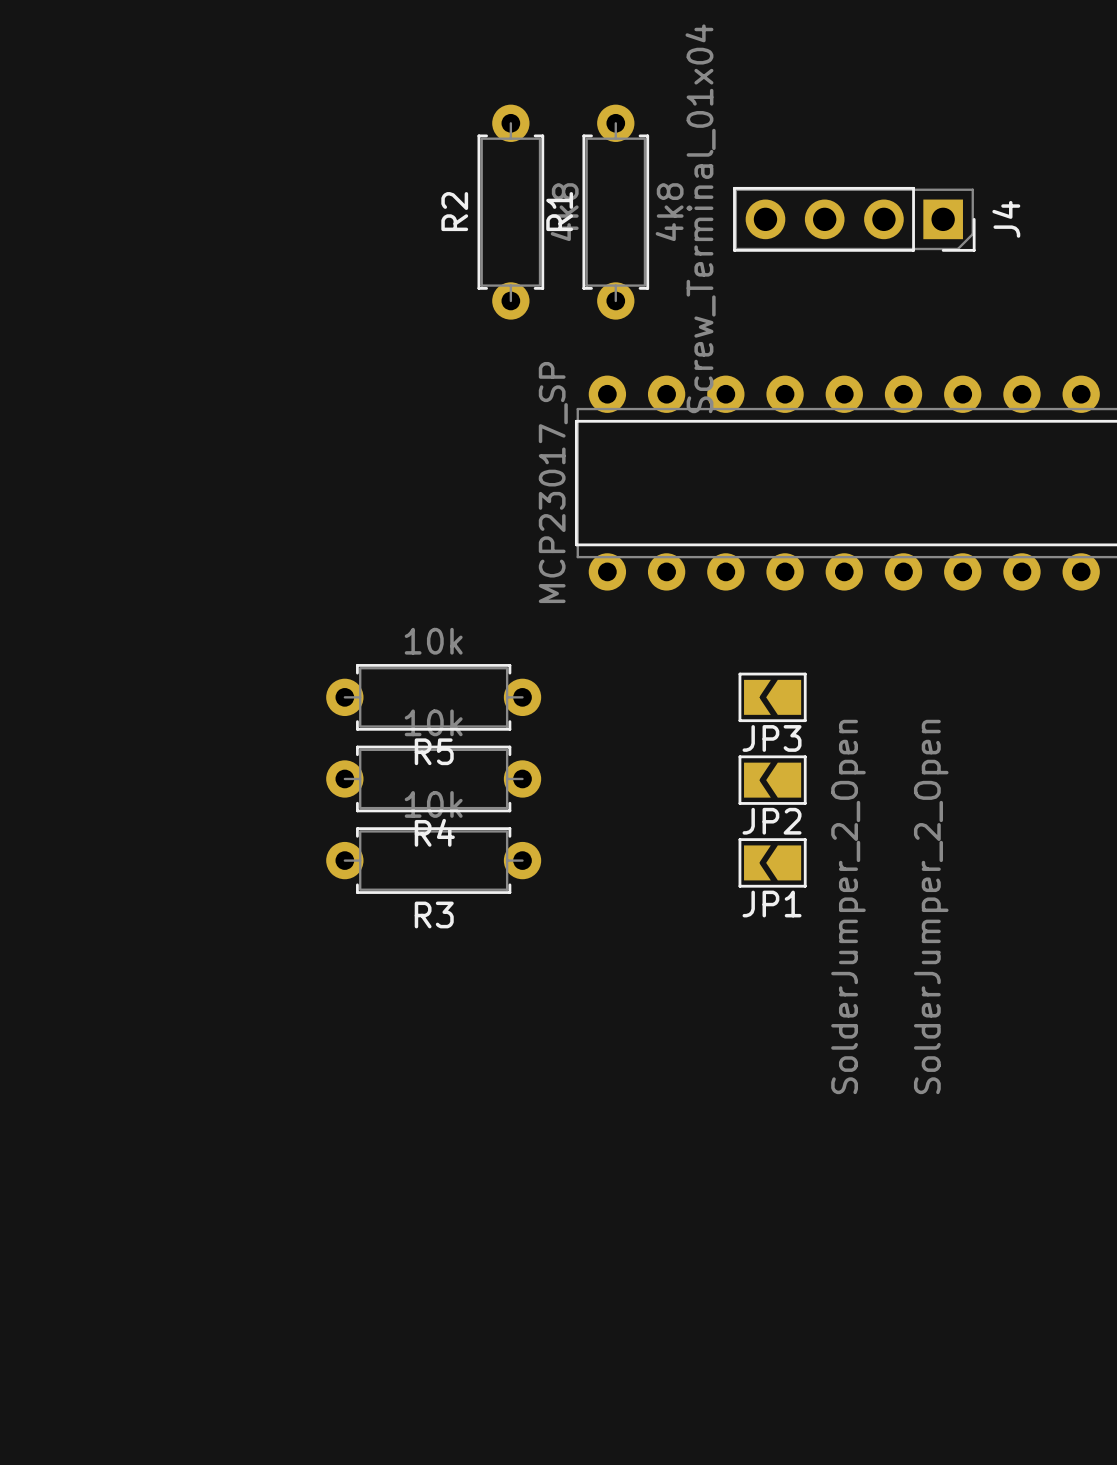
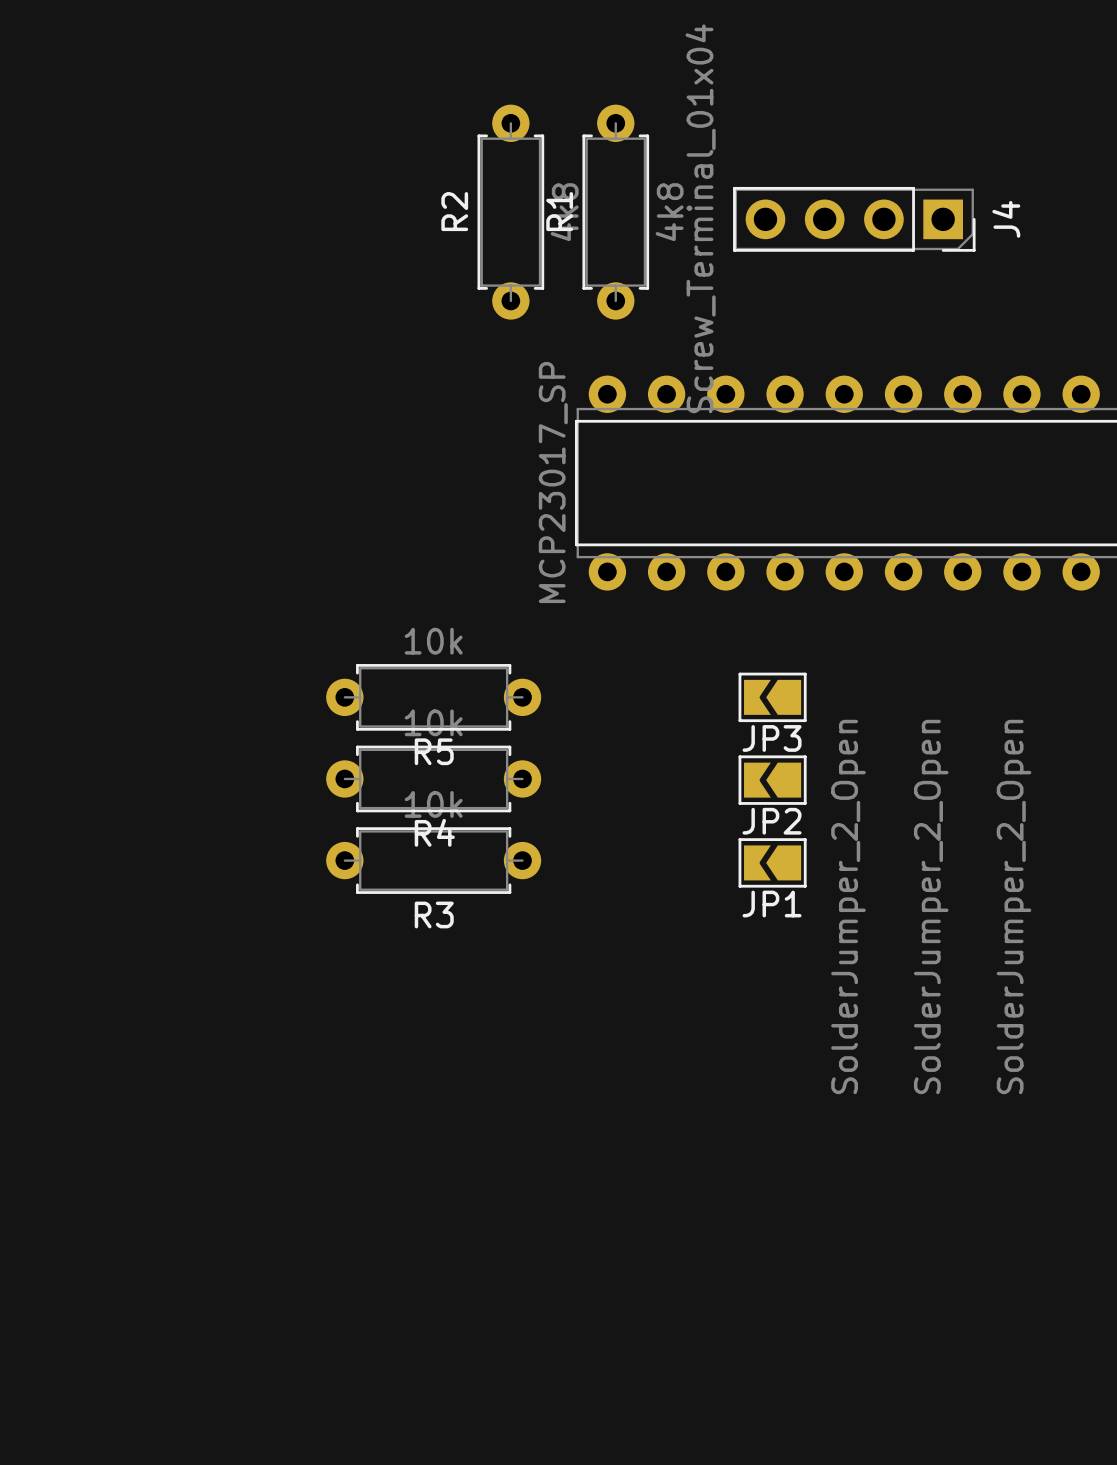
JP3 value: none -> SolderJumper_2_Open (1014, 906)

